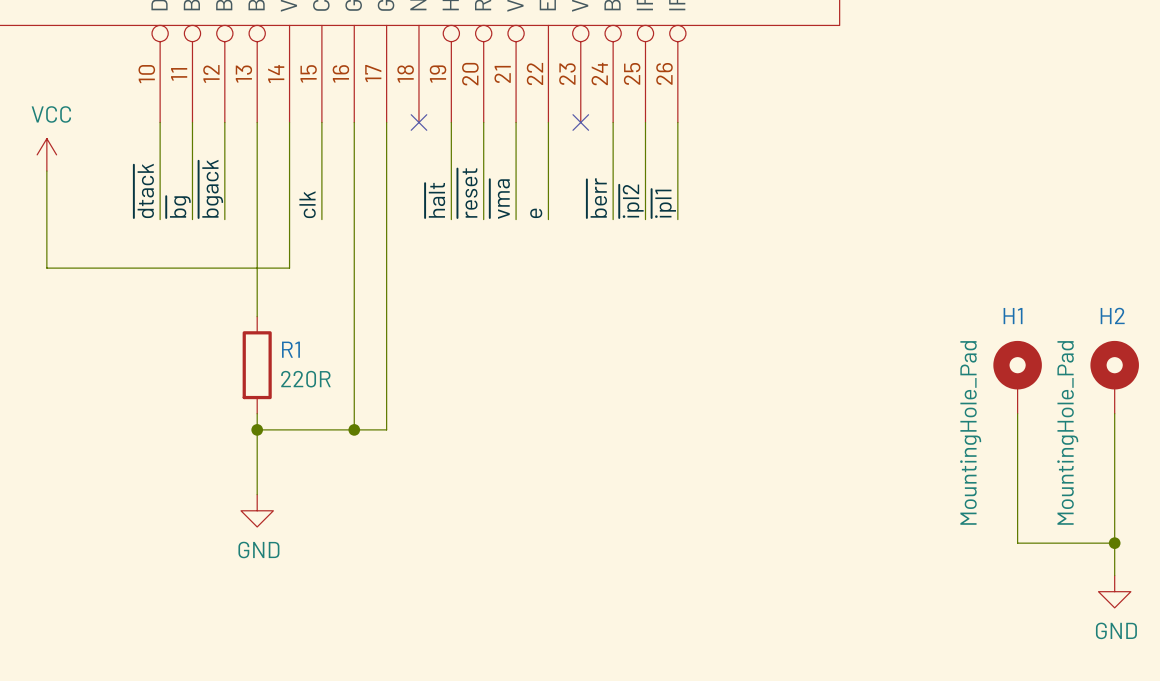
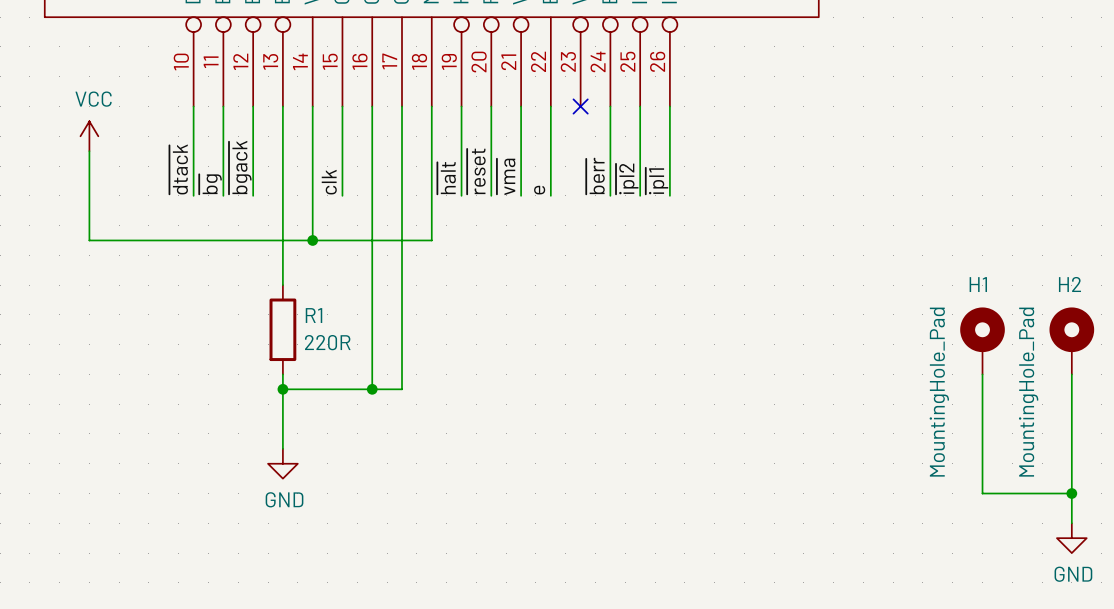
wire: none -> (431, 106) (431, 240) (312, 240)
no-connect mark: (418, 122) -> none
junction: none -> (312, 240)

